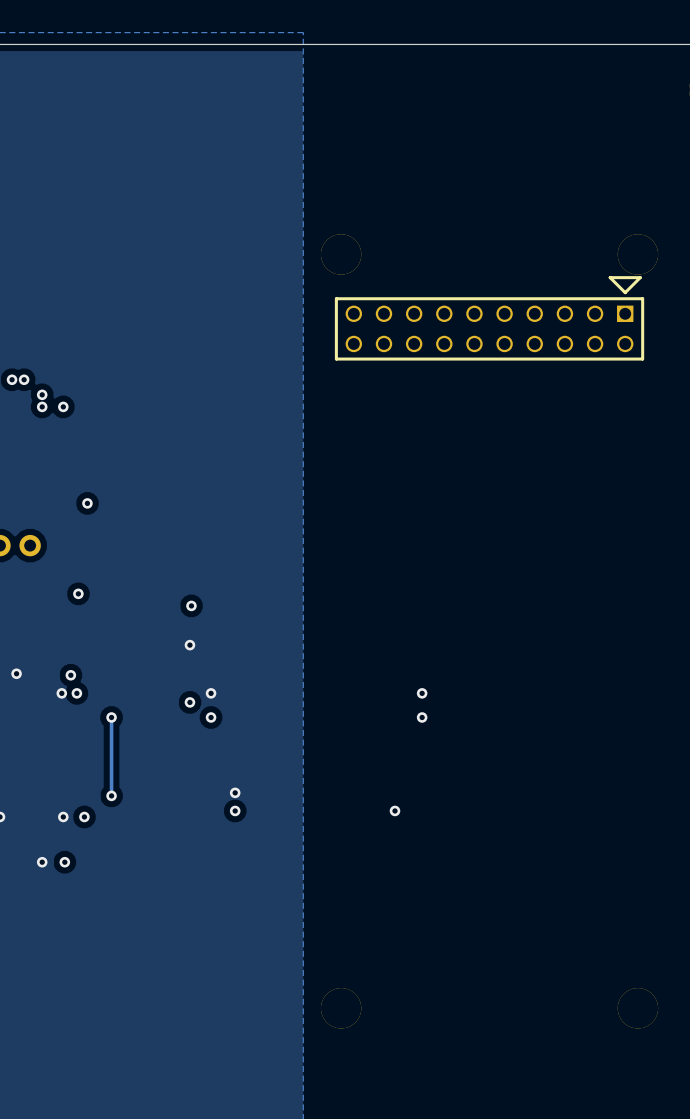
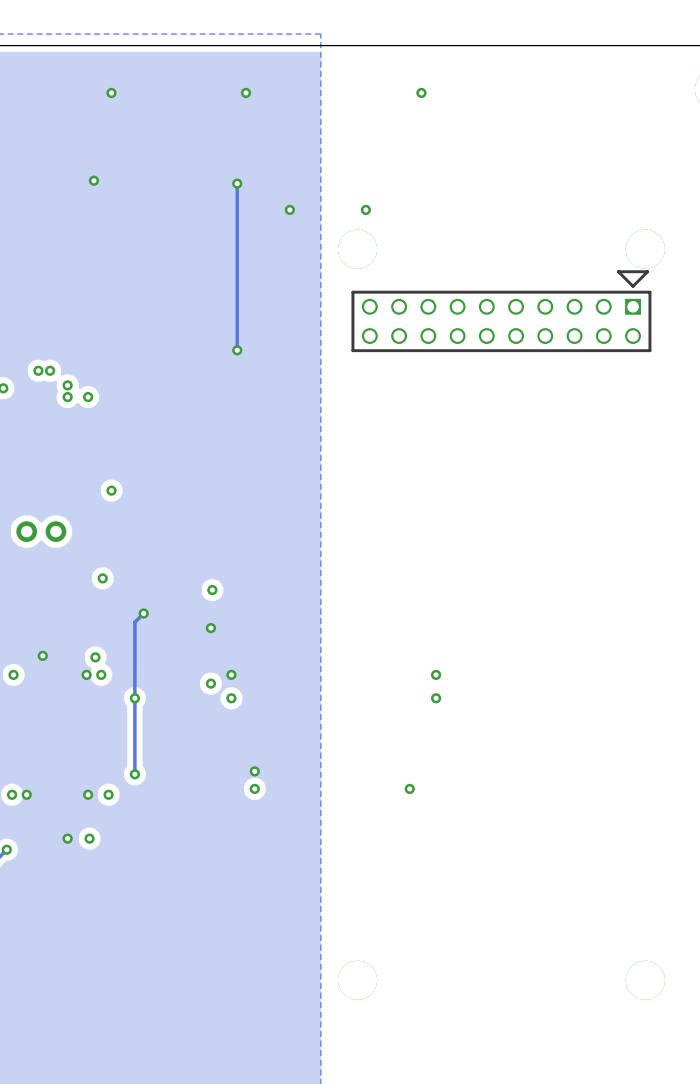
via: none -> (111, 92)
via: none -> (246, 92)
via: none -> (421, 92)
via: none -> (93, 180)
track: none -> (237, 183) (237, 350)
via: none -> (237, 183)
via: none -> (289, 209)
via: none -> (365, 209)
via: none -> (237, 350)
track: none -> (143, 613) (134, 622) (134, 698)
via: none -> (143, 613)

